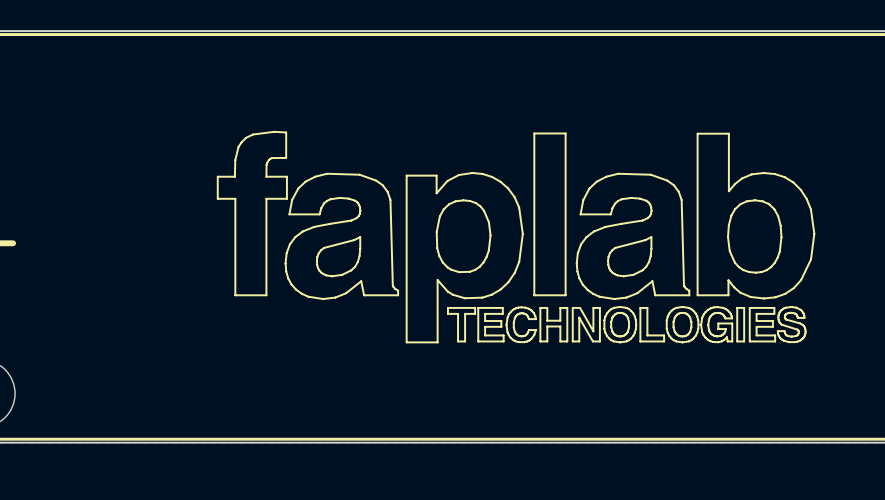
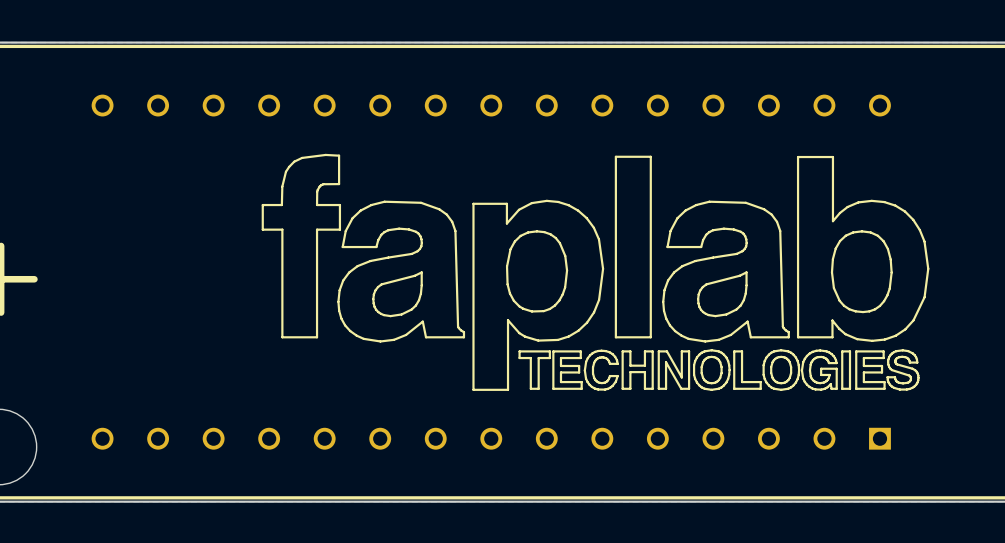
part: none -> (102, 105)
part: none -> (158, 105)
part: none -> (213, 105)
part: none -> (269, 105)
part: none -> (324, 105)
part: none -> (380, 105)
part: none -> (435, 105)
part: none -> (491, 105)
part: none -> (546, 105)
part: none -> (602, 105)
part: none -> (657, 105)
part: none -> (713, 105)
part: none -> (768, 105)
part: none -> (824, 105)
part: none -> (879, 105)
part: none -> (102, 438)
part: none -> (158, 438)
part: none -> (213, 438)
part: none -> (269, 438)
part: none -> (324, 438)
part: none -> (380, 438)
part: none -> (435, 438)
part: none -> (491, 438)
part: none -> (546, 438)
part: none -> (602, 438)
part: none -> (657, 438)
part: none -> (713, 438)
part: none -> (768, 438)
part: none -> (824, 438)
part: none -> (879, 438)

